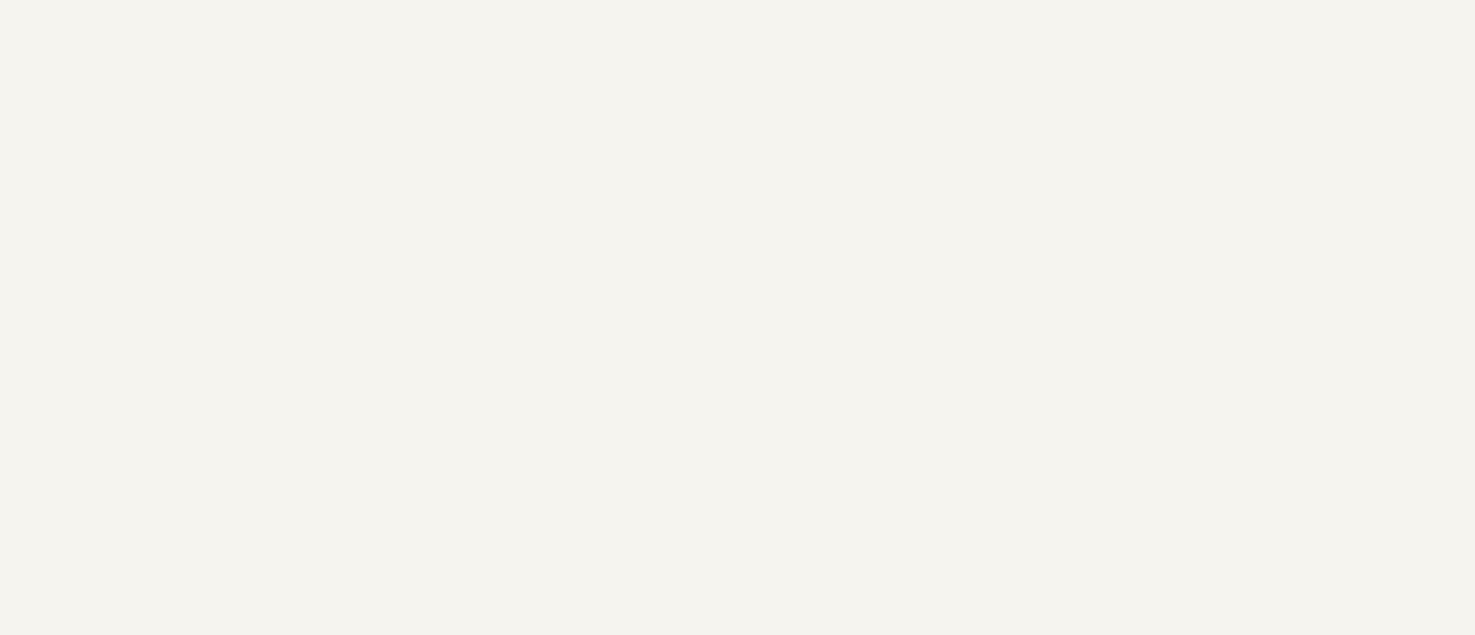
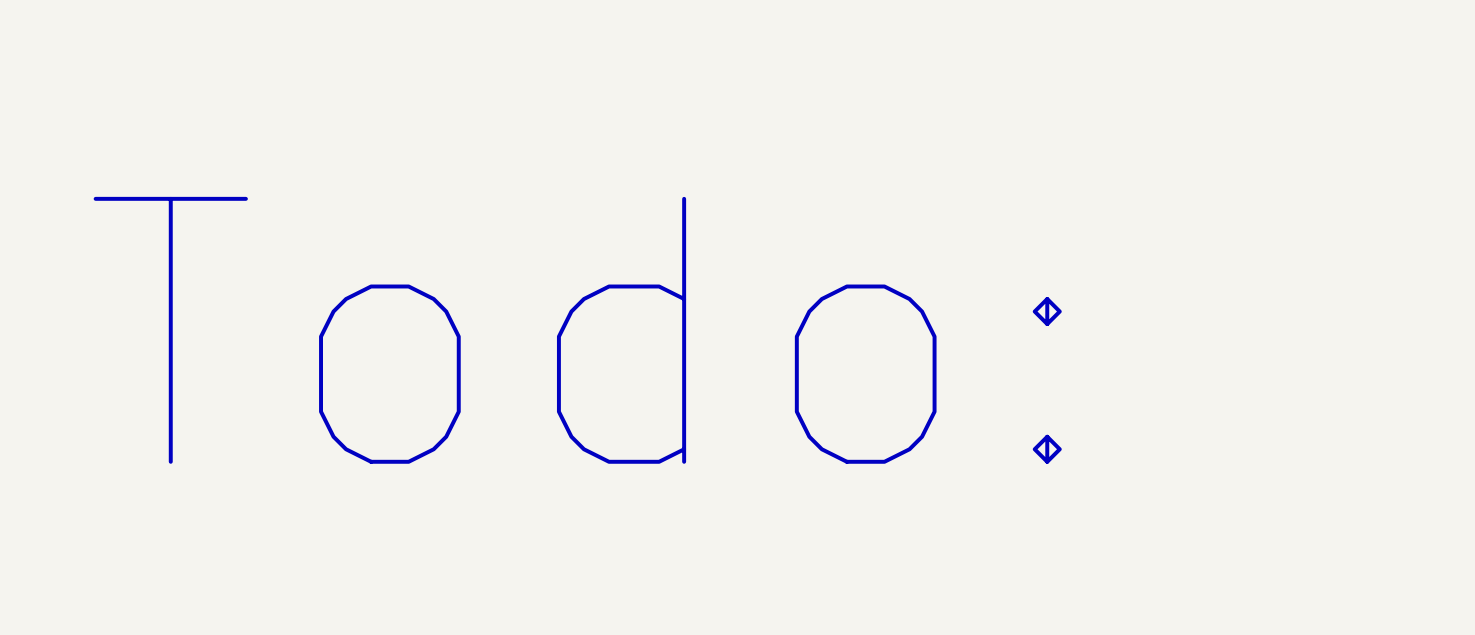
text: none -> Todo: (577, 330)

